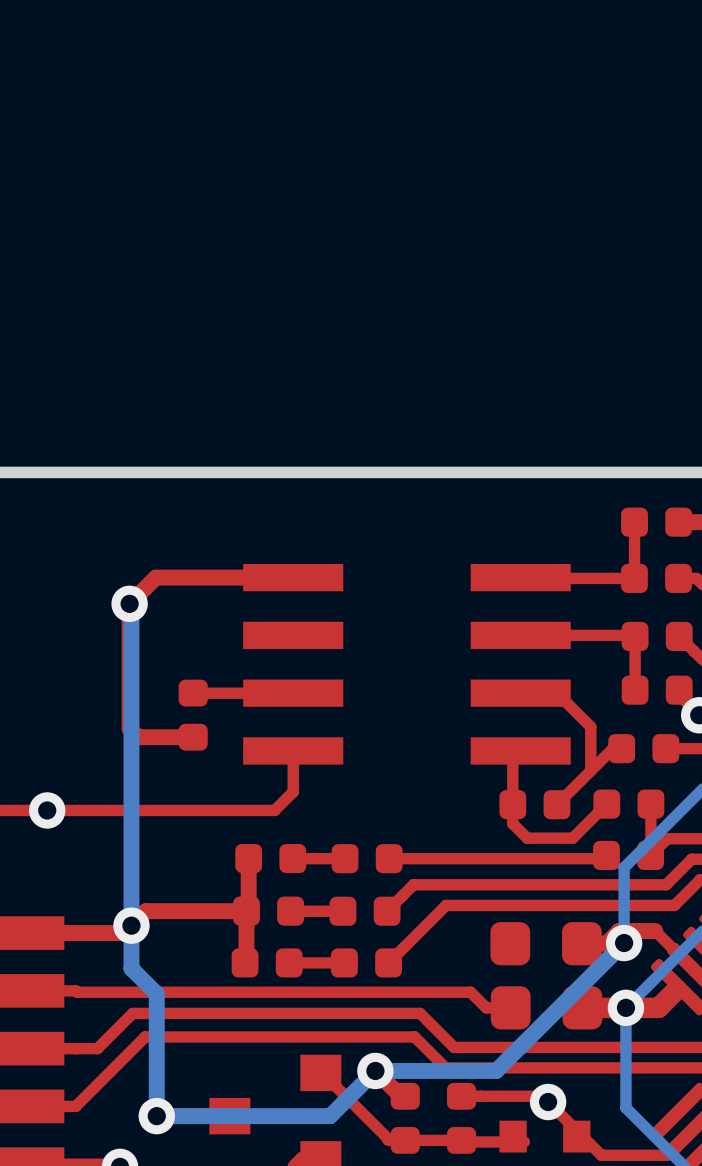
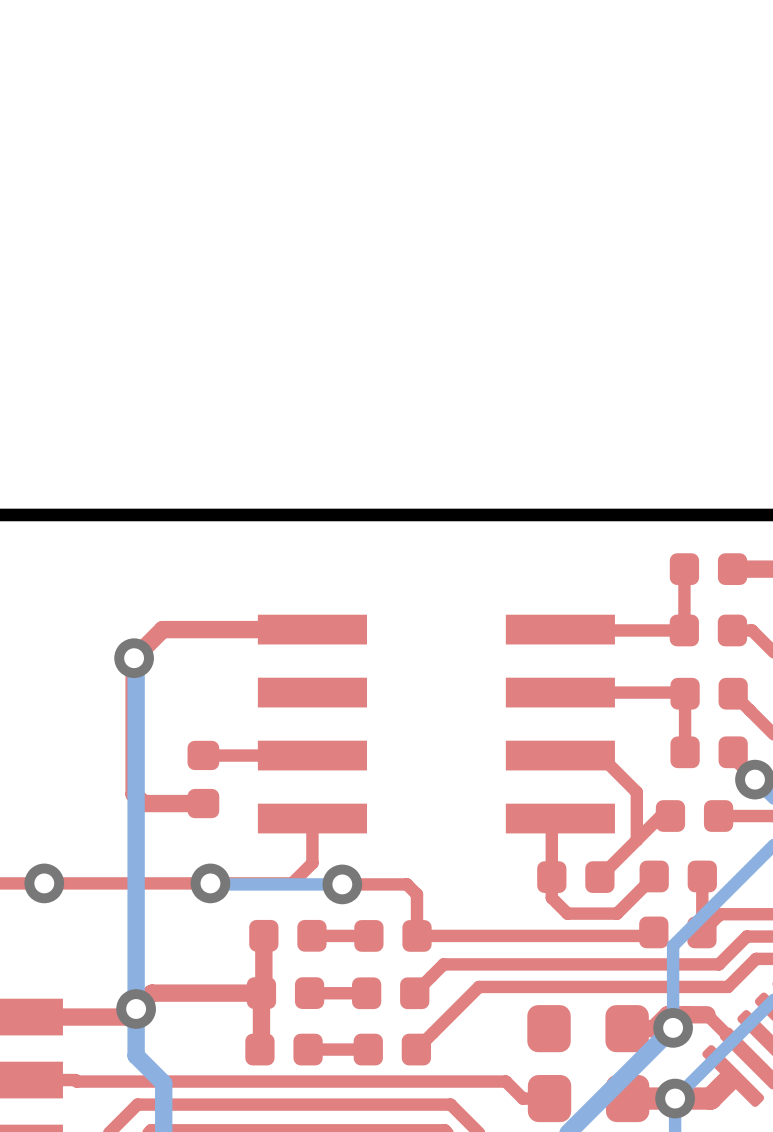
bottom track: none -> (210, 883) (342, 884)
via: none -> (210, 883)
top track: none -> (342, 884) (406, 884) (417, 894) (417, 935)
via: none -> (342, 884)

